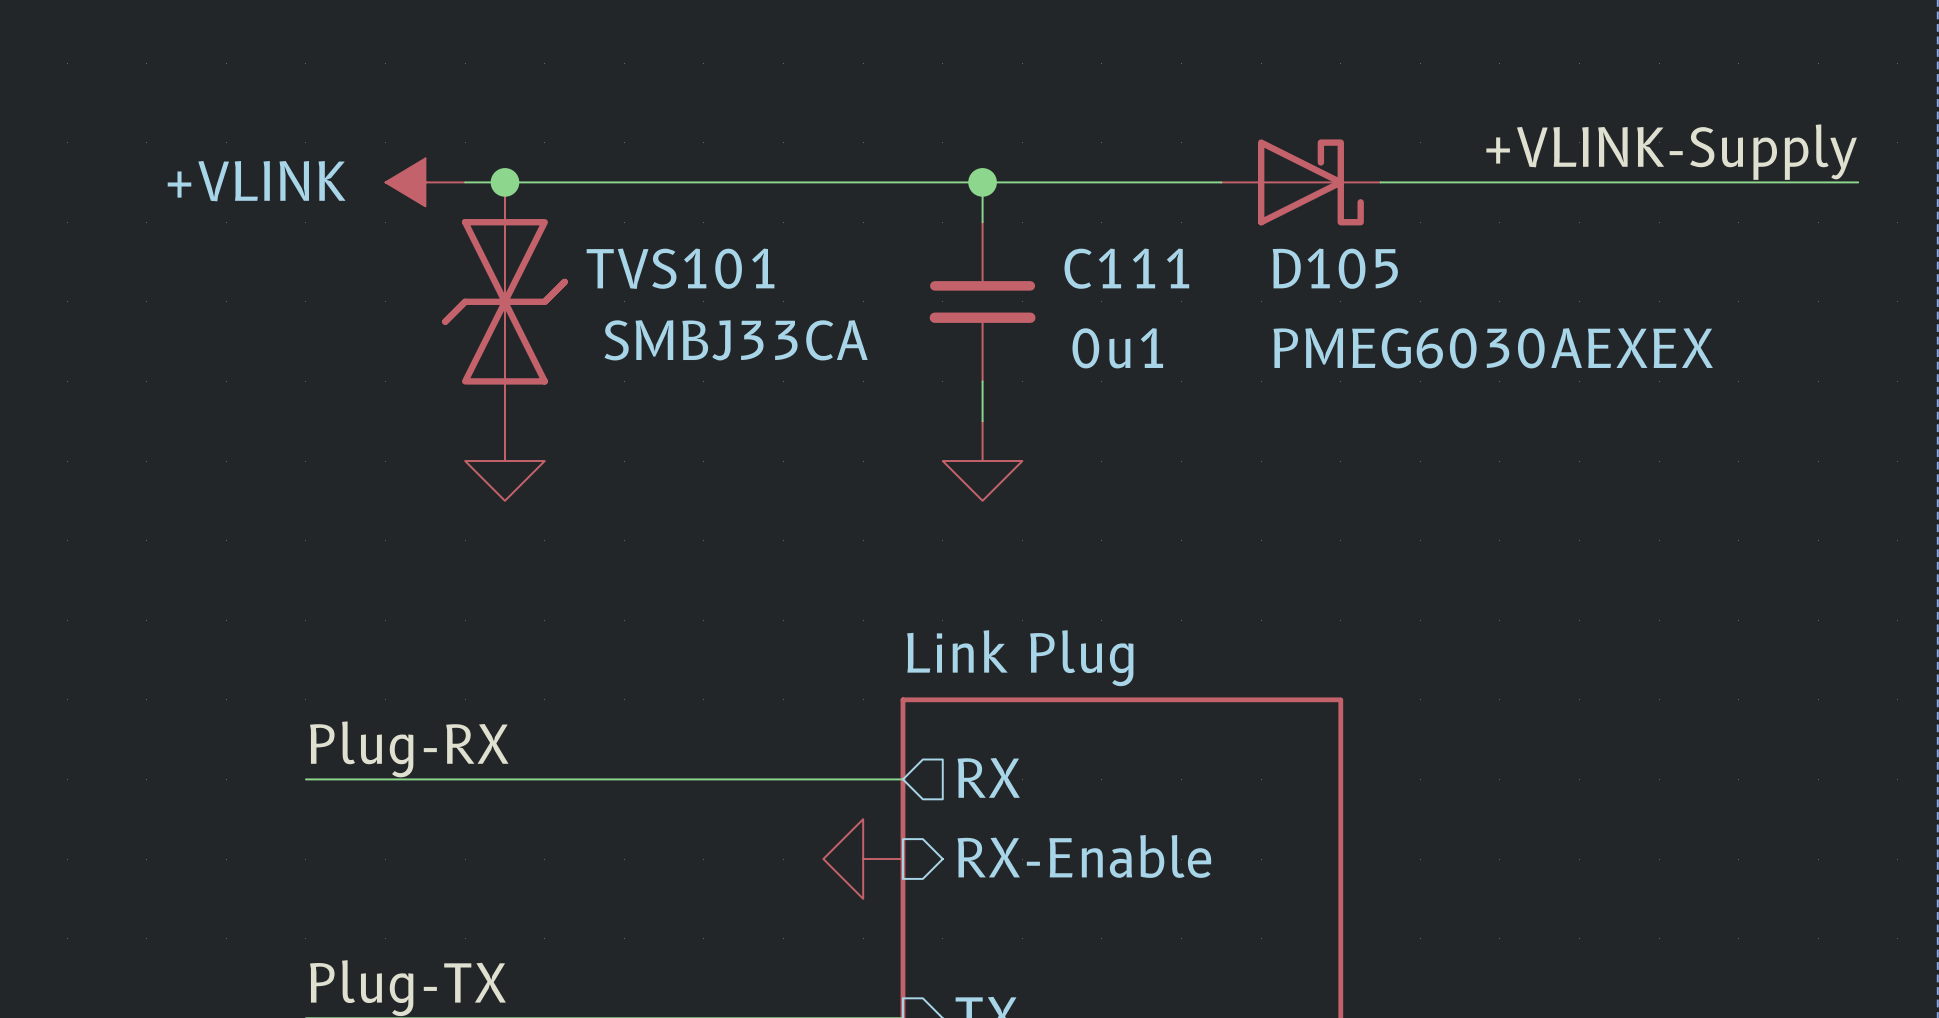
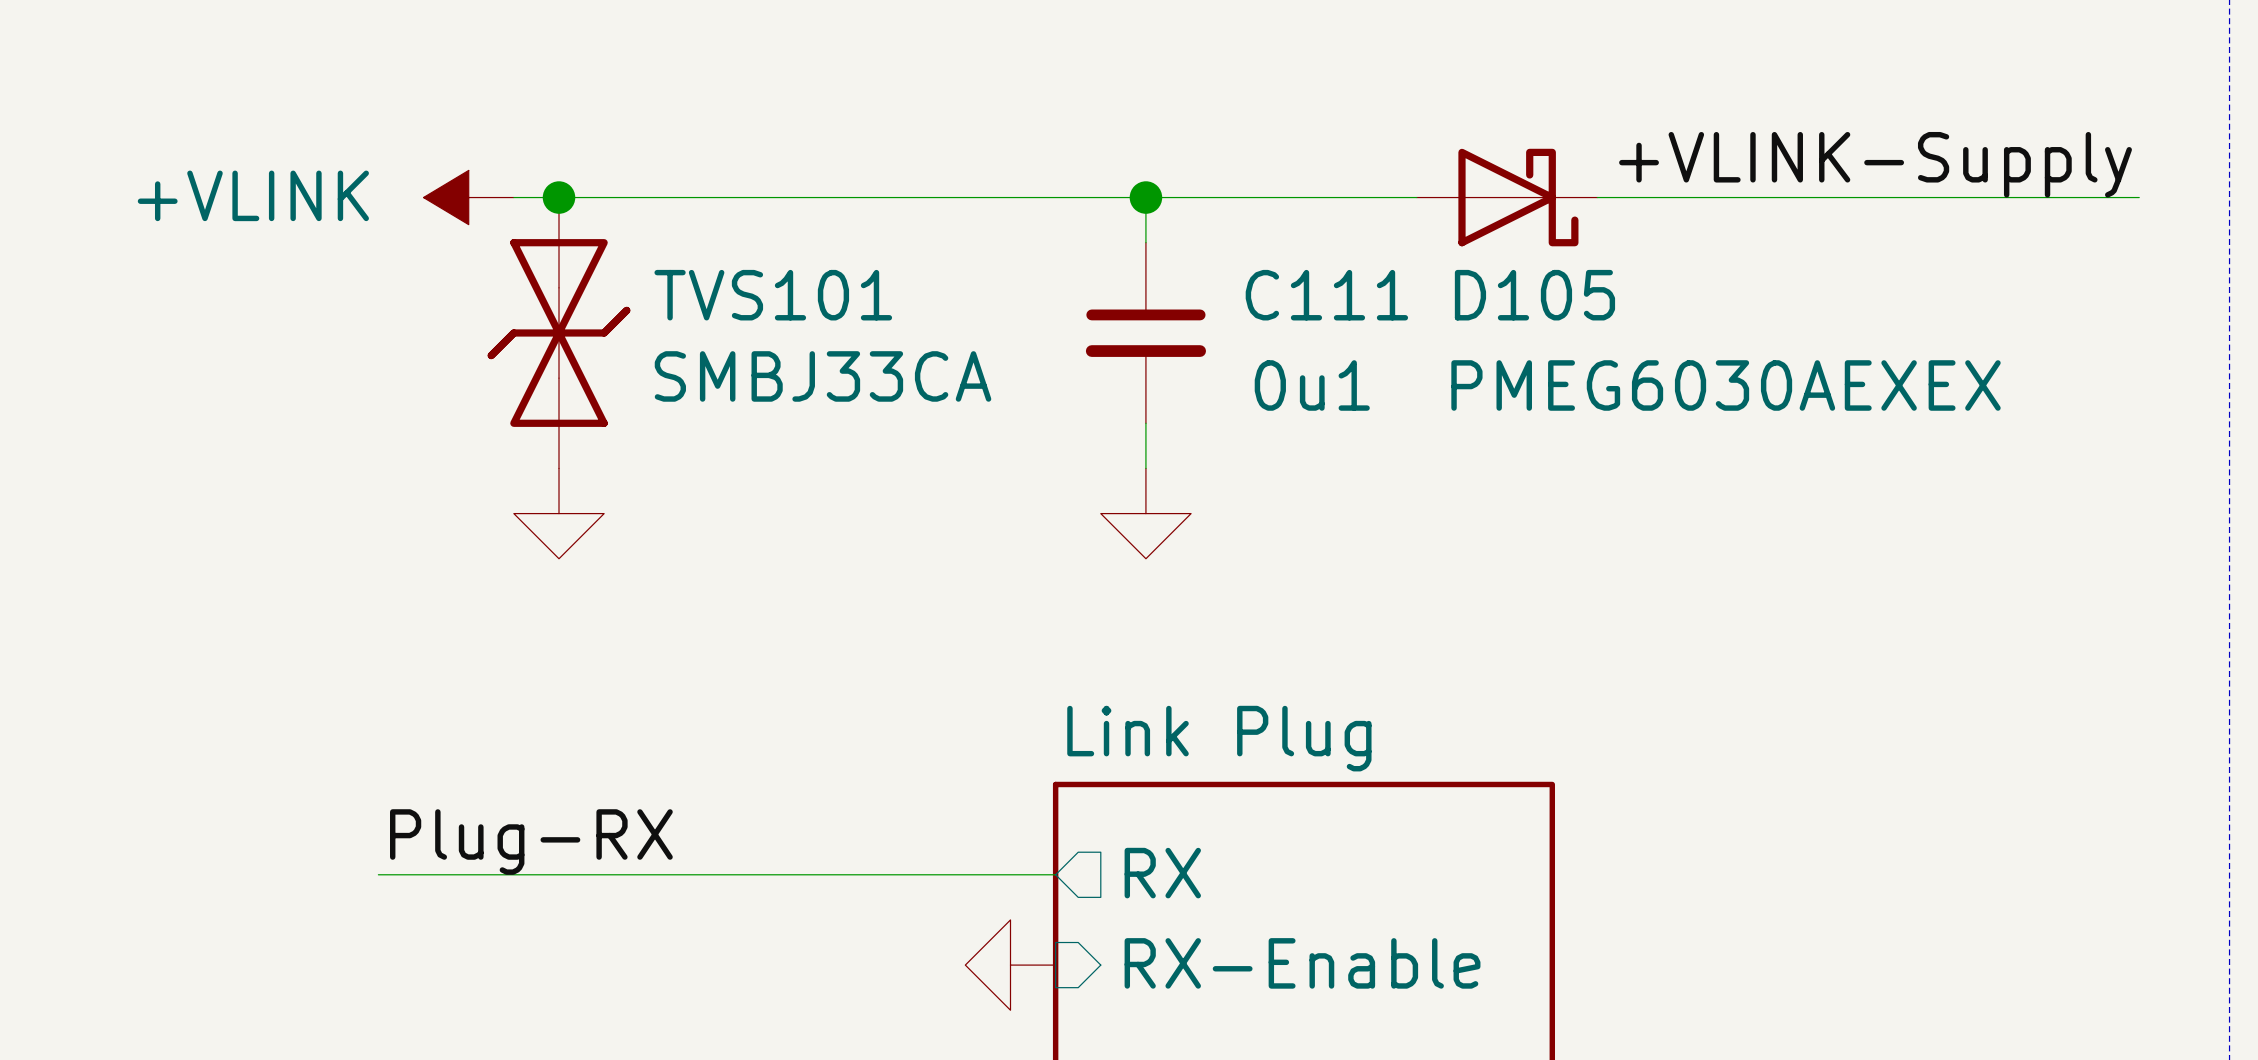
power symbol position: +VLINK (425, 182) -> +VLINK (468, 197)
junction position: (504, 182) -> (559, 197)
TVS101 position: (504, 301) -> (559, 332)
power symbol position: (504, 461) -> (559, 513)

